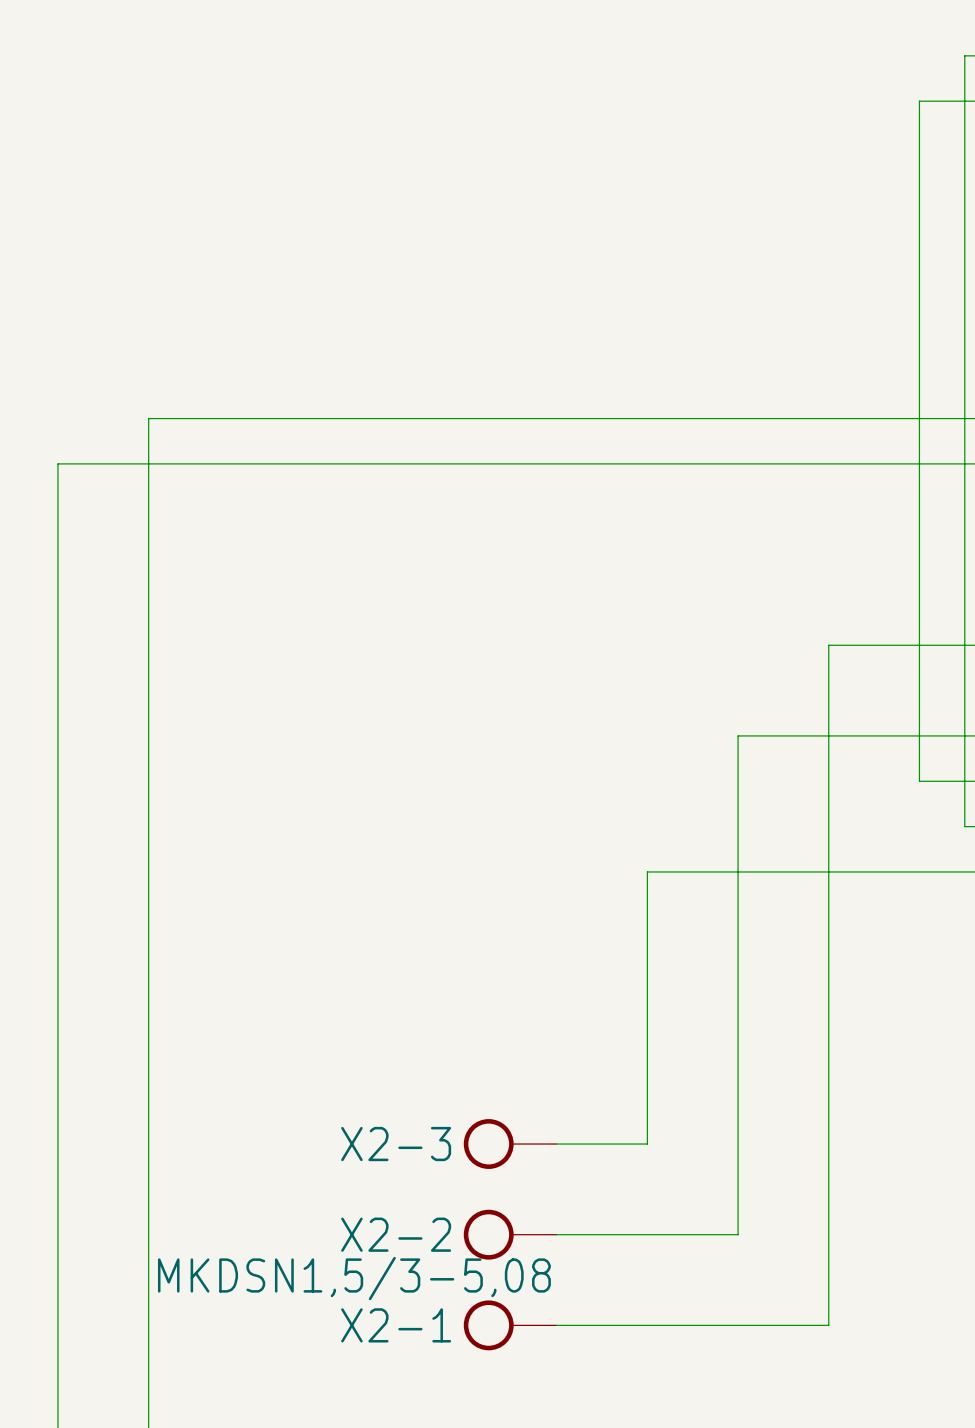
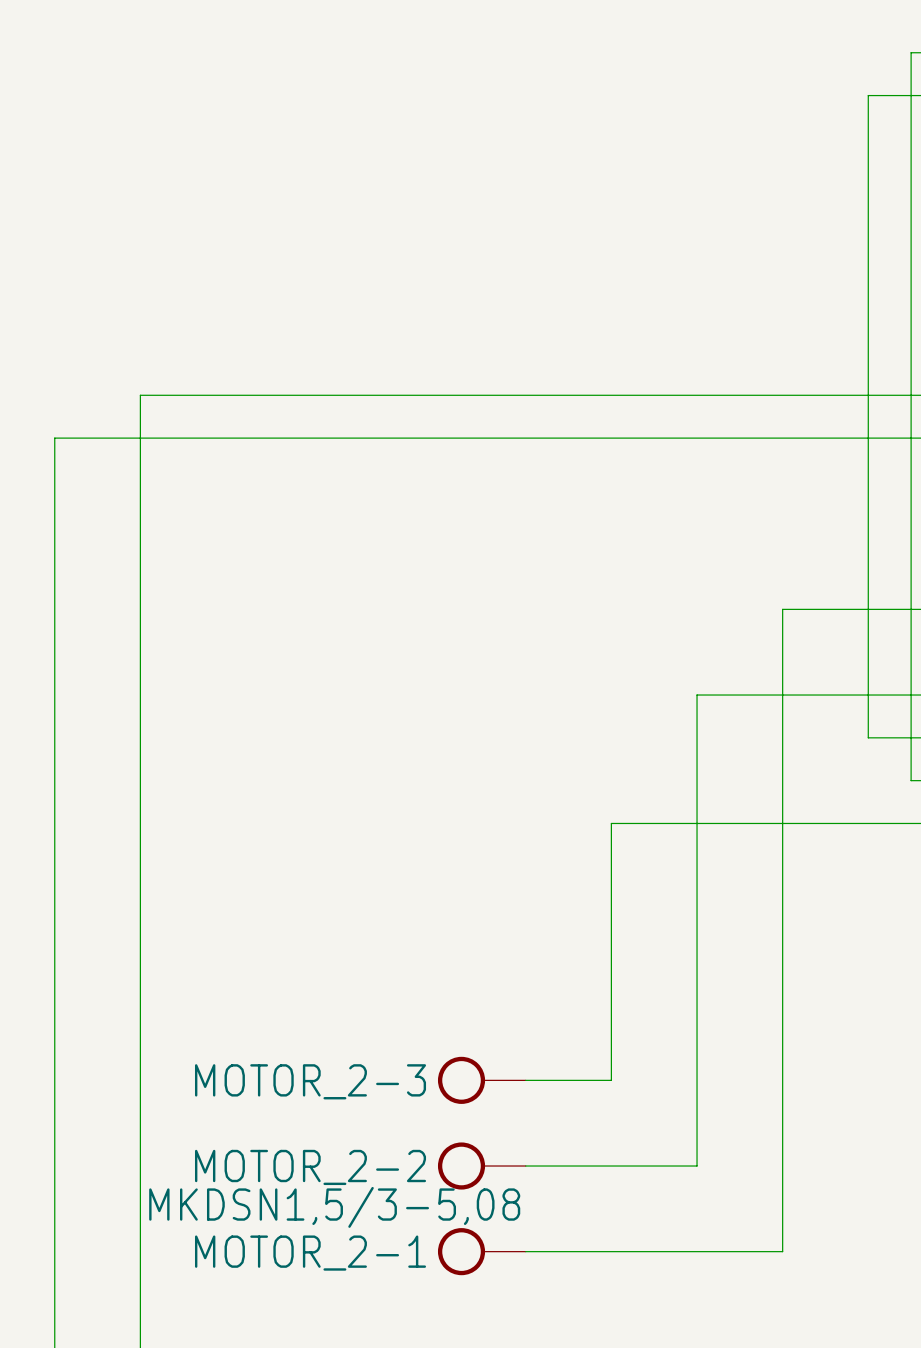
X2-3 name: X2-3 (396, 1144) -> MOTOR_2-3 (310, 1081)
X2-2 name: X2-2 (396, 1234) -> MOTOR_2-2 (310, 1167)
X2-1 name: X2-1 (396, 1325) -> MOTOR_2-1 (310, 1253)

